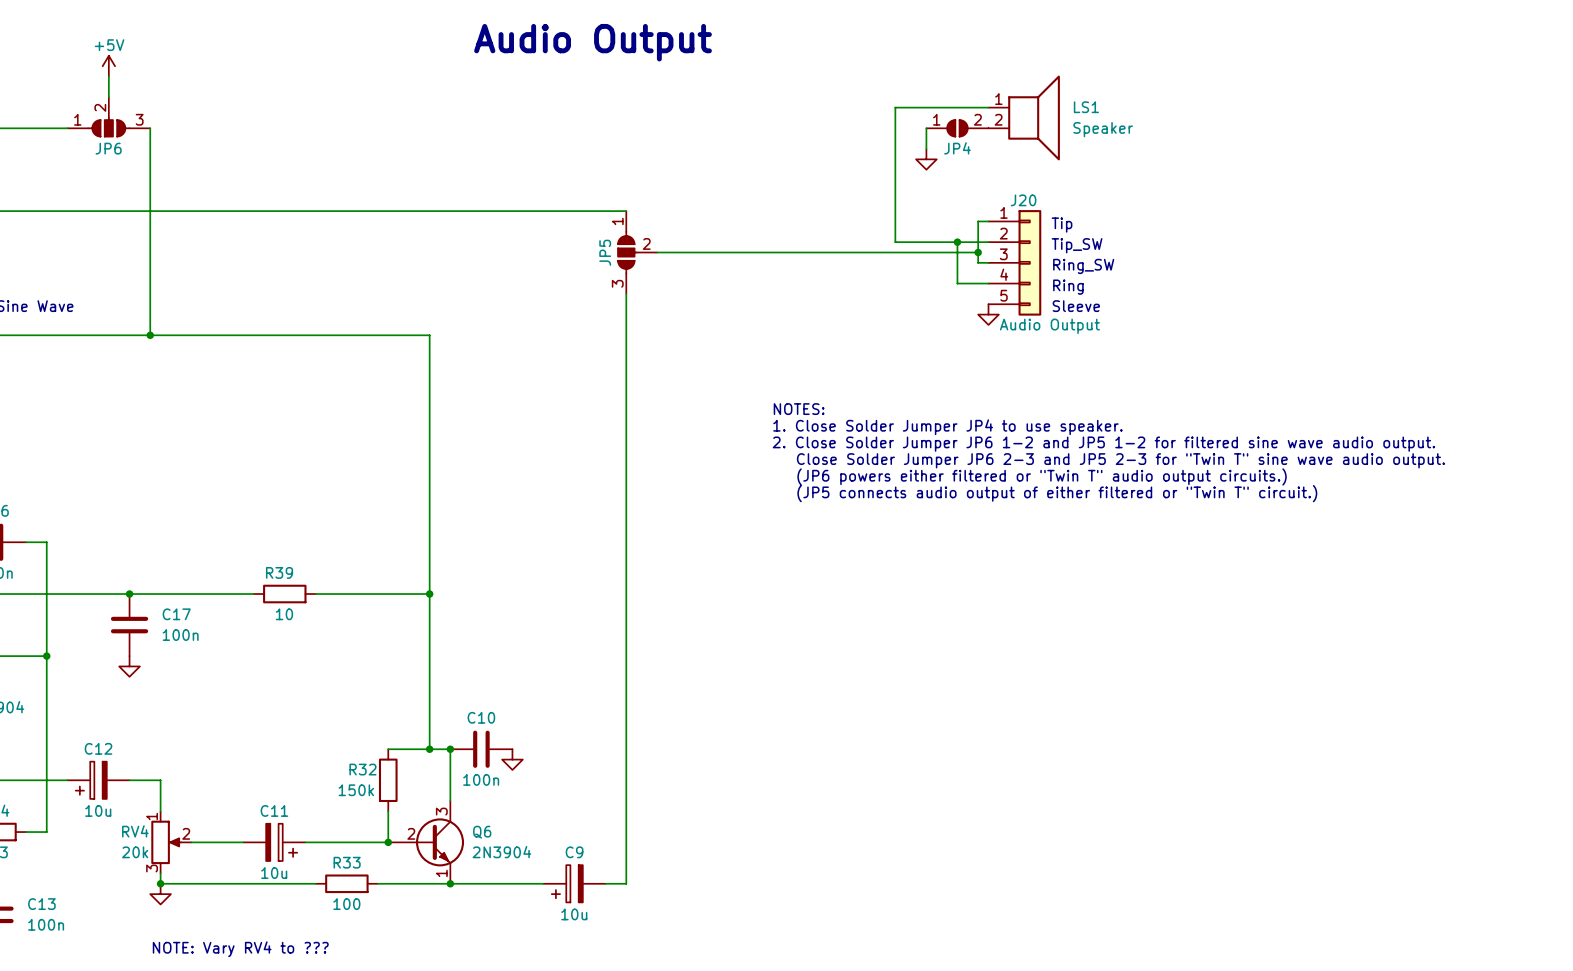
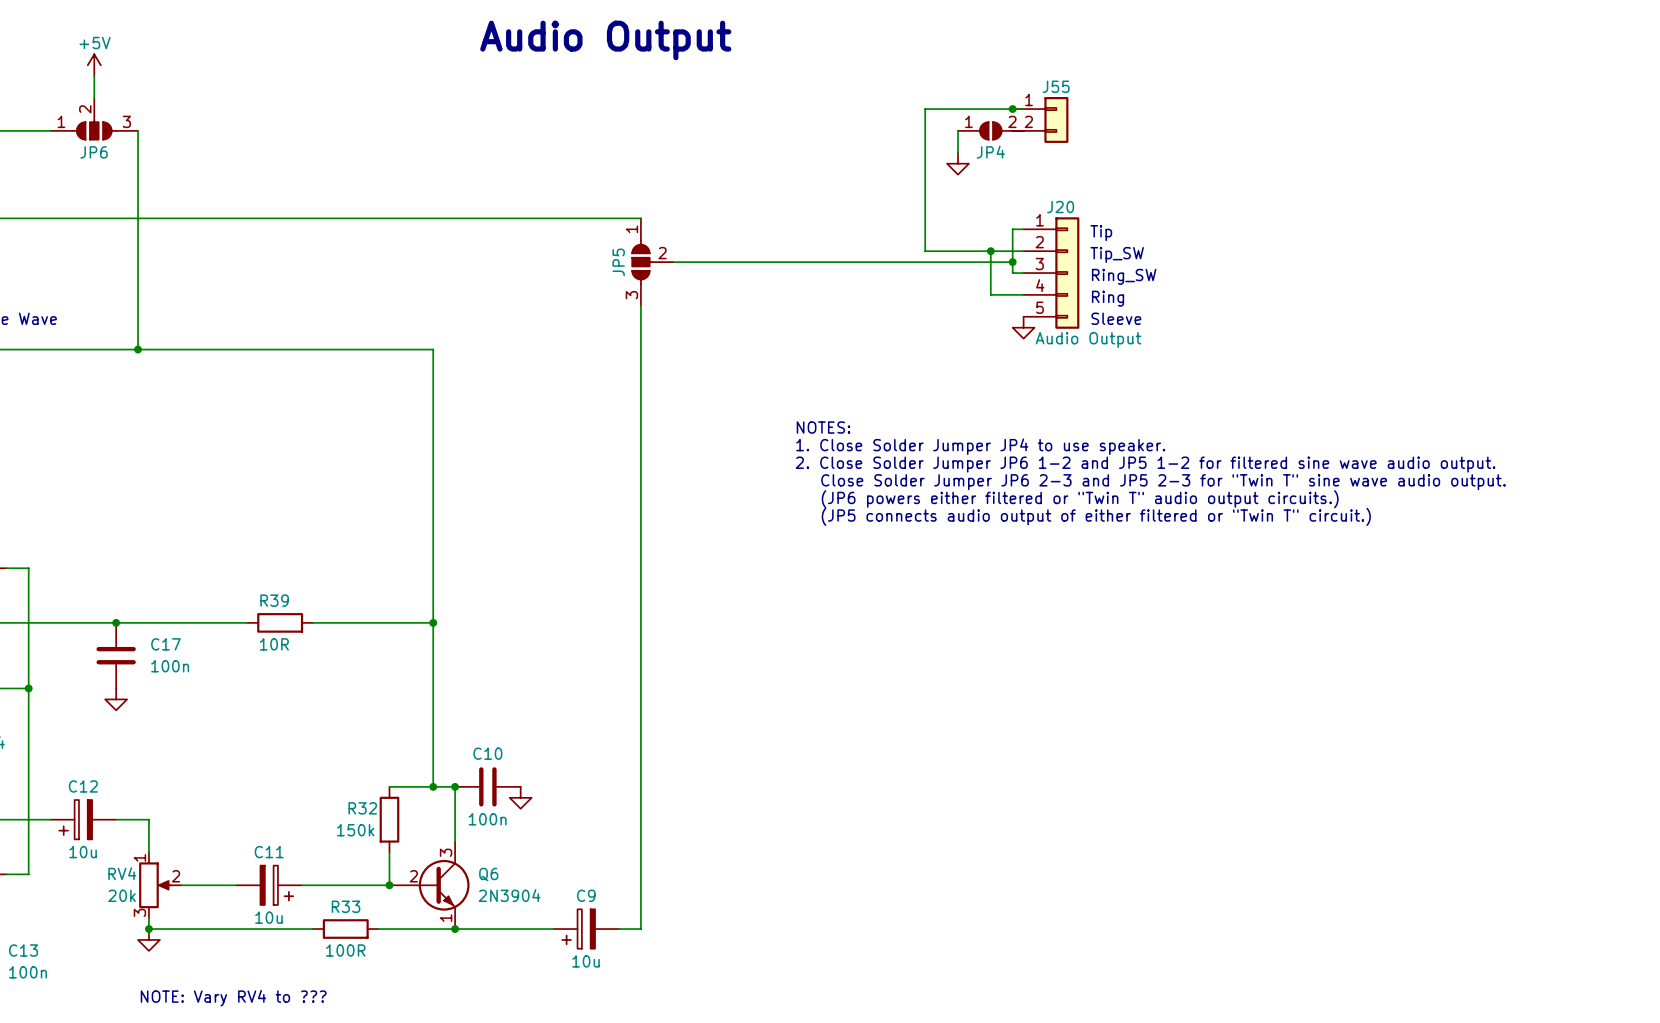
junction: none -> (1012, 109)
J55: none -> (1040, 119)
LS1: Speaker (1024, 117) -> none
R39 value: 10 (284, 614) -> 10R (274, 644)
R33 value: 100 (346, 904) -> 100R (345, 950)

